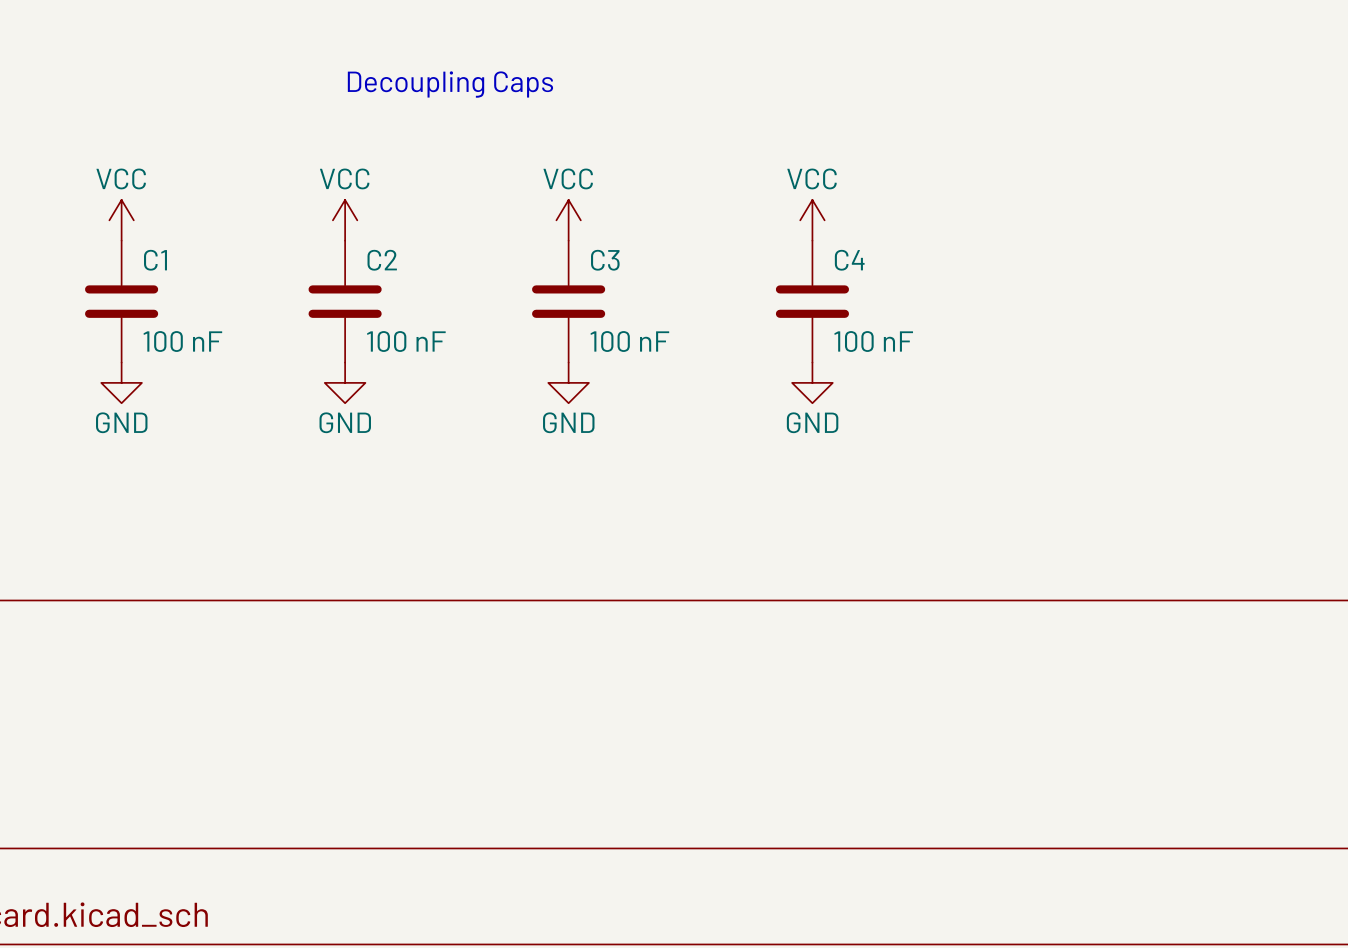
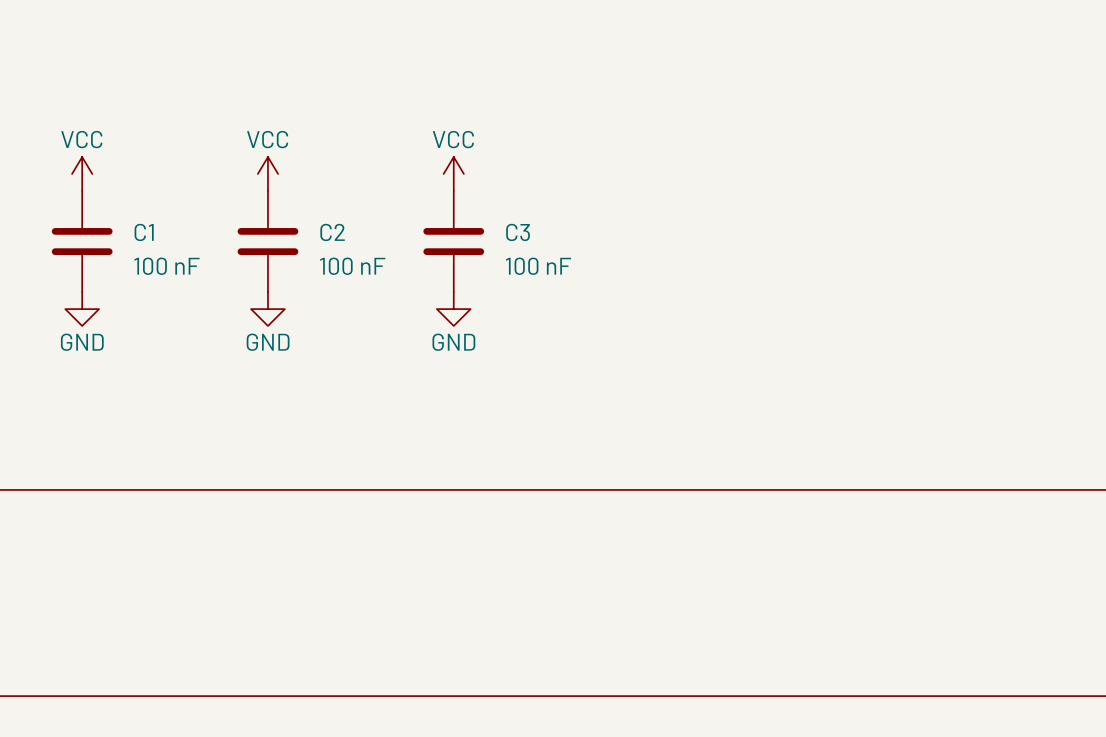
text: Decoupling Caps (450, 84) -> none
power symbol: VCC (812, 220) -> none
C1 name position: C1 (155, 260) -> C1 (144, 232)
C2 name position: C2 (382, 260) -> C2 (332, 232)
C3 name position: C3 (605, 260) -> C3 (518, 232)
C4: 100 nF (812, 301) -> none
C1 value position: 100 nF (182, 341) -> 100 nF (166, 266)
C2 value position: 100 nF (406, 341) -> 100 nF (352, 266)
C3 value position: 100 nF (629, 341) -> 100 nF (538, 266)
power symbol: GND (812, 382) -> none

